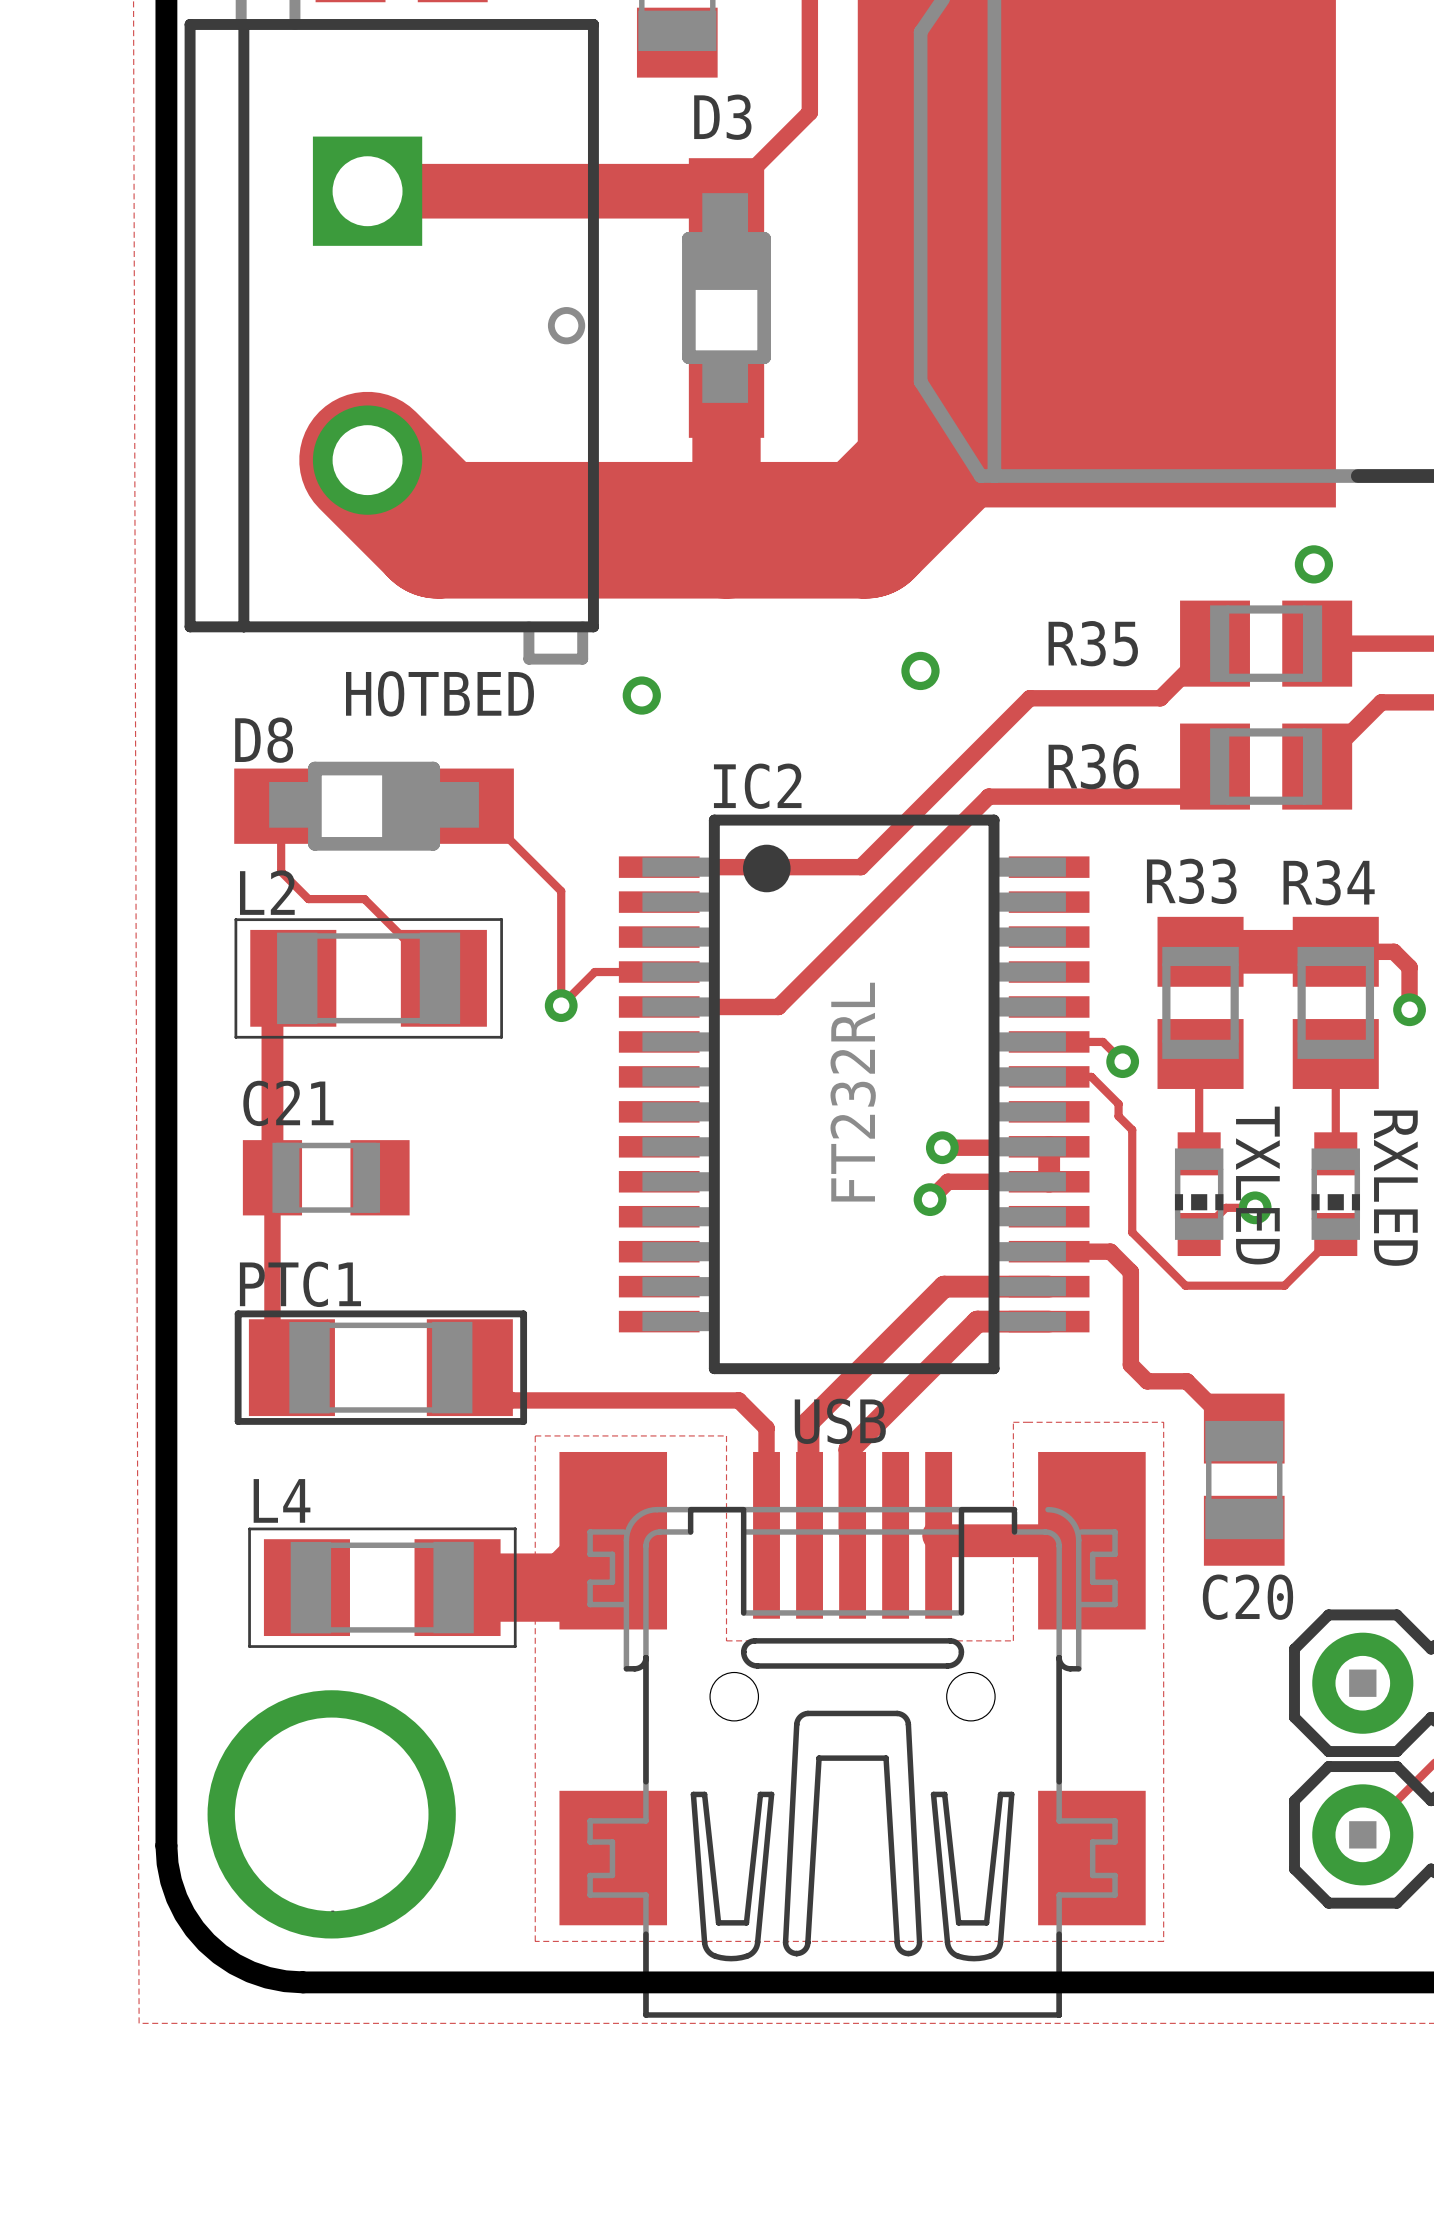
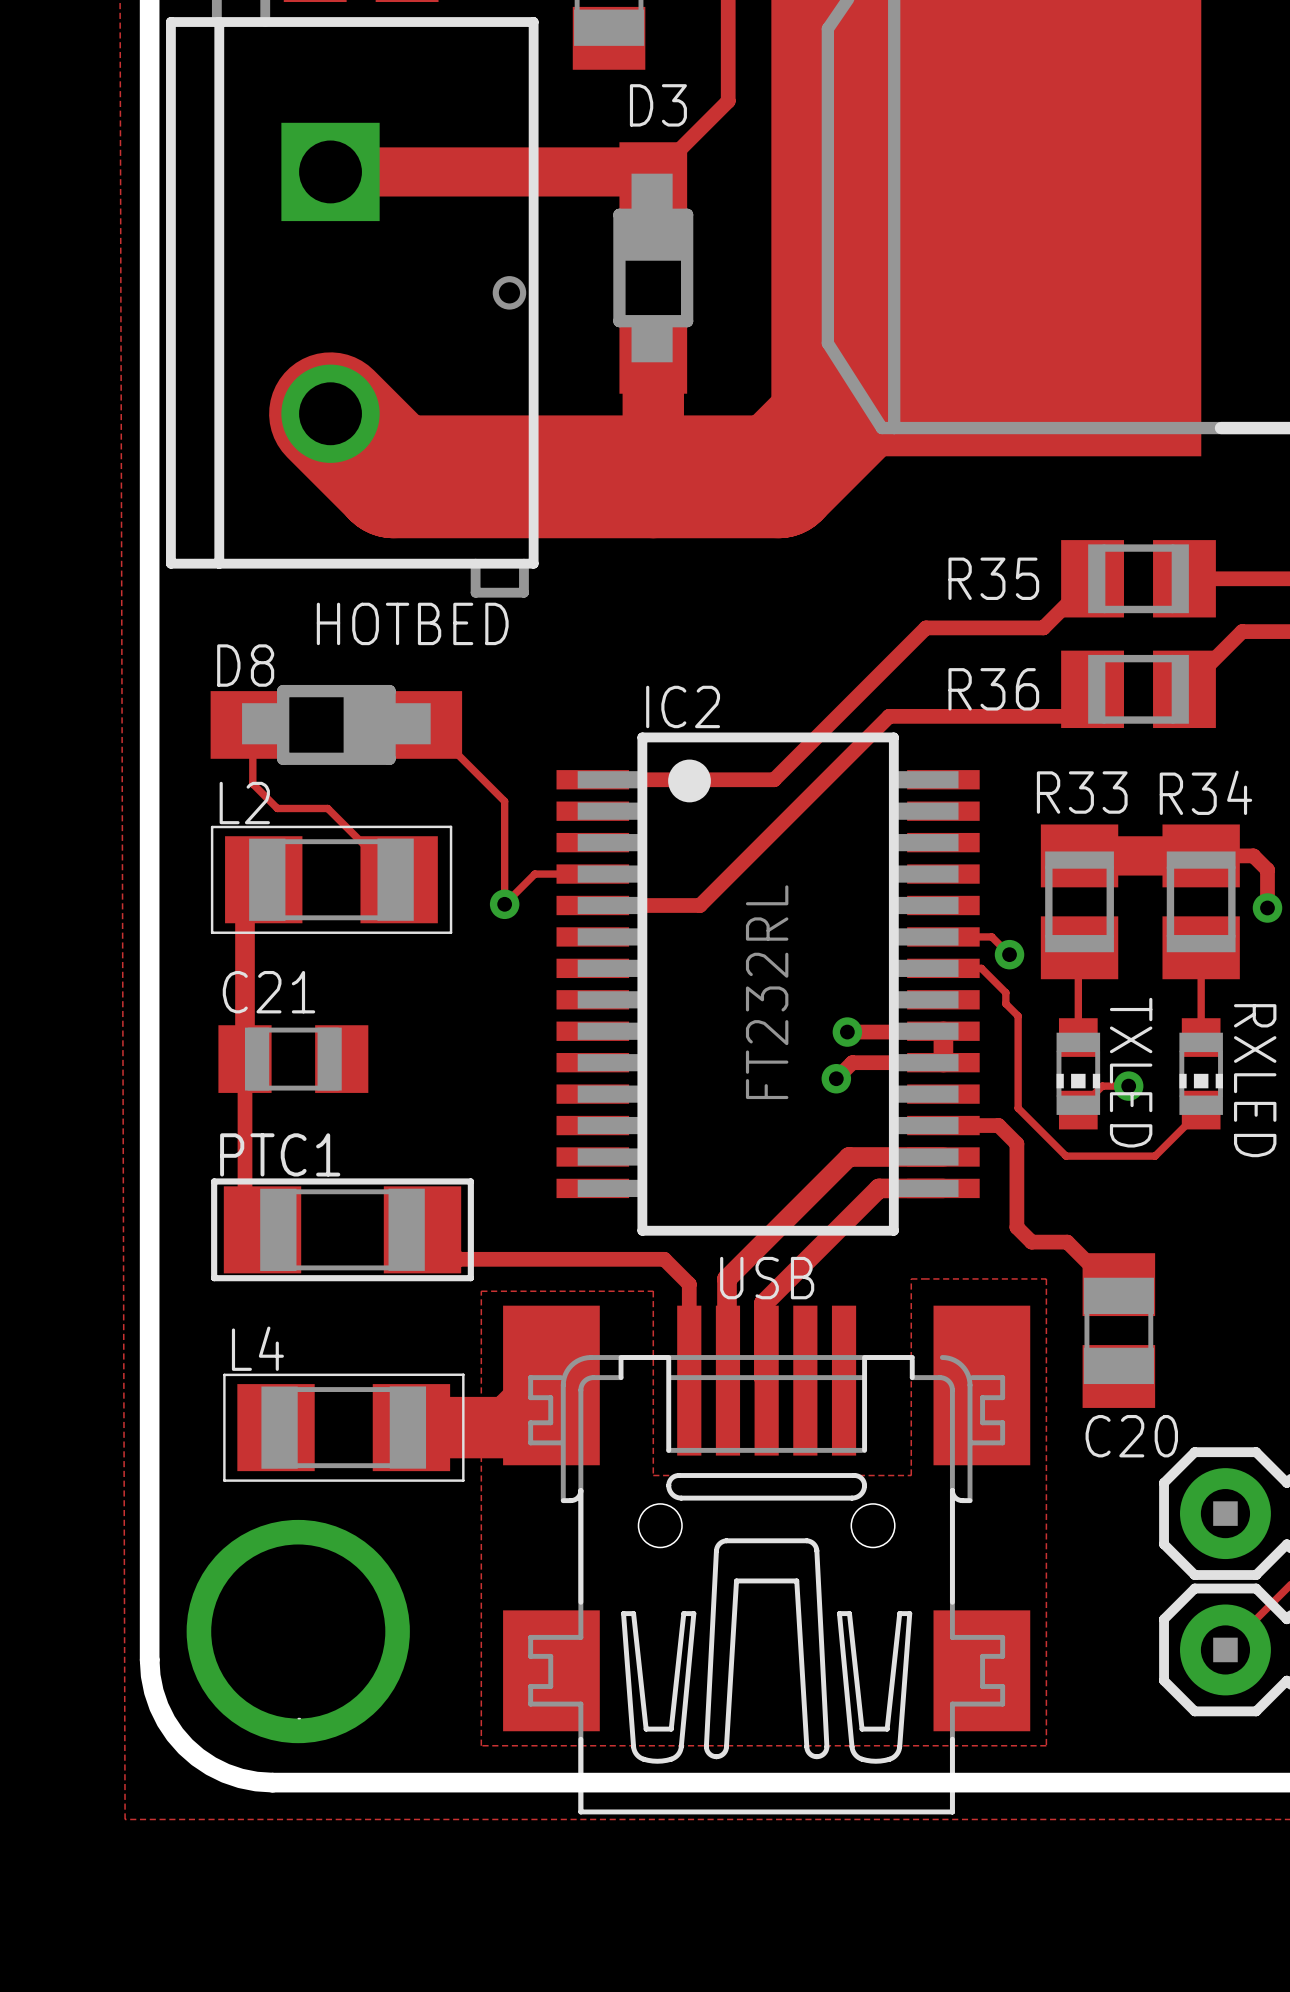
via: (1313, 564) -> none
via: (920, 670) -> none
via: (641, 695) -> none
track: (938, 1535) (944, 1540) (1091, 1540) -> none

